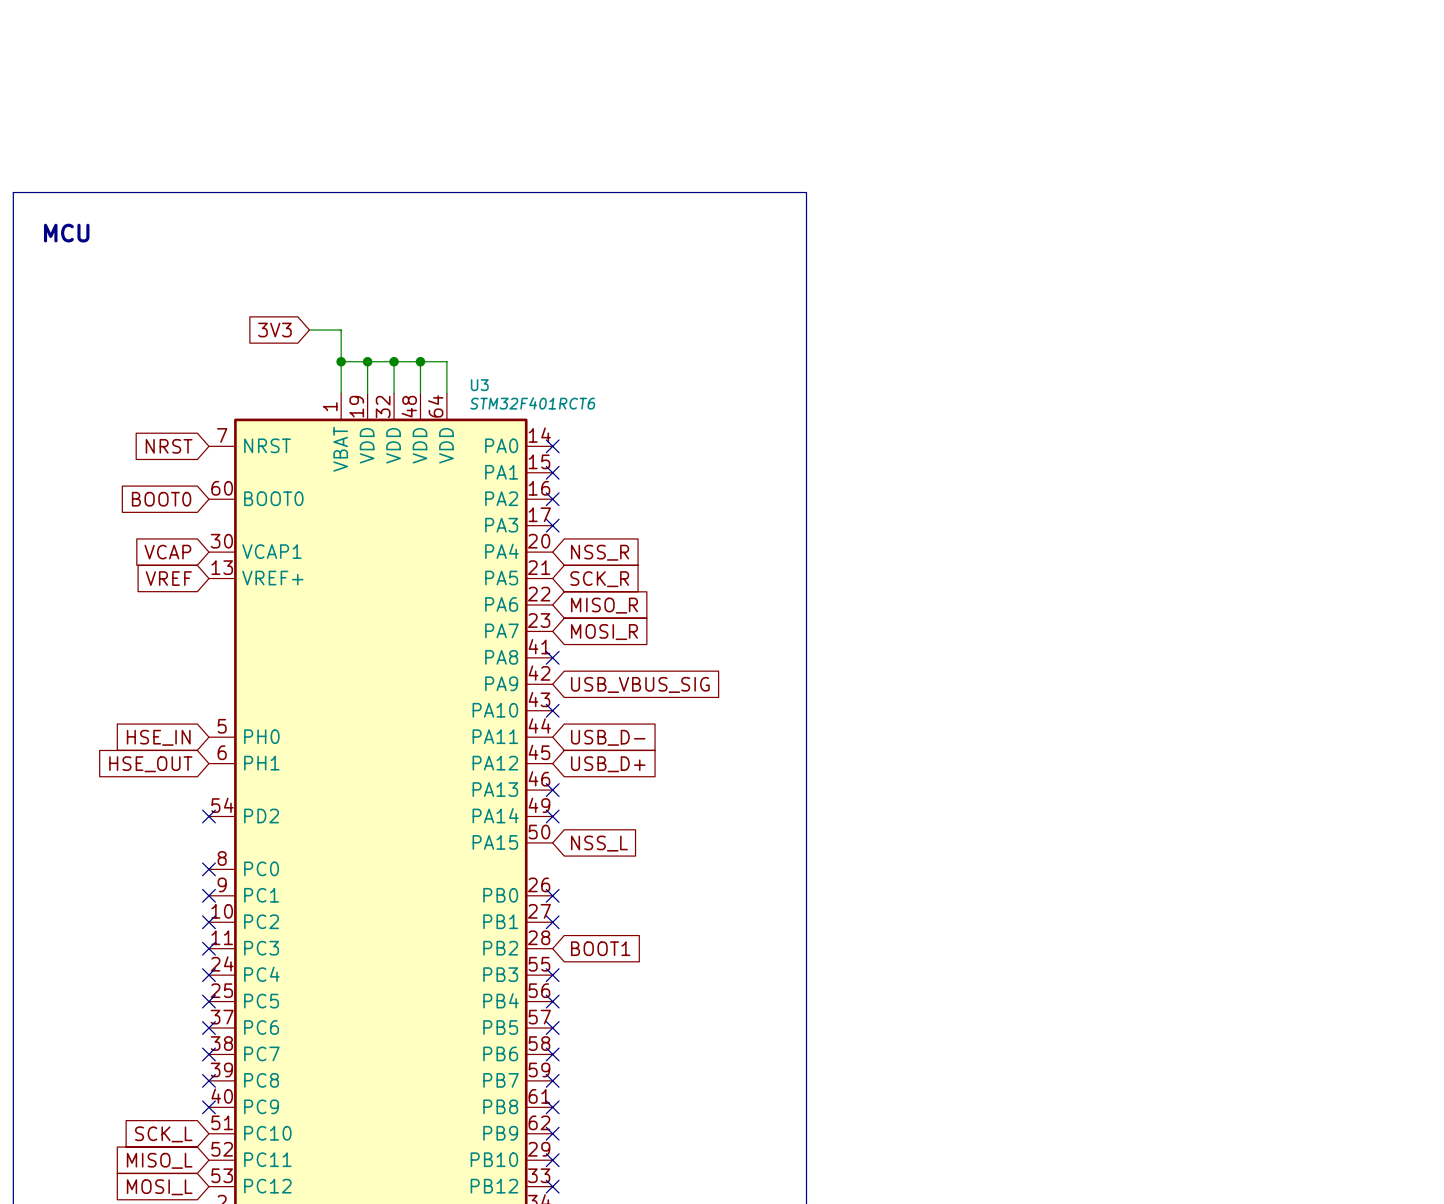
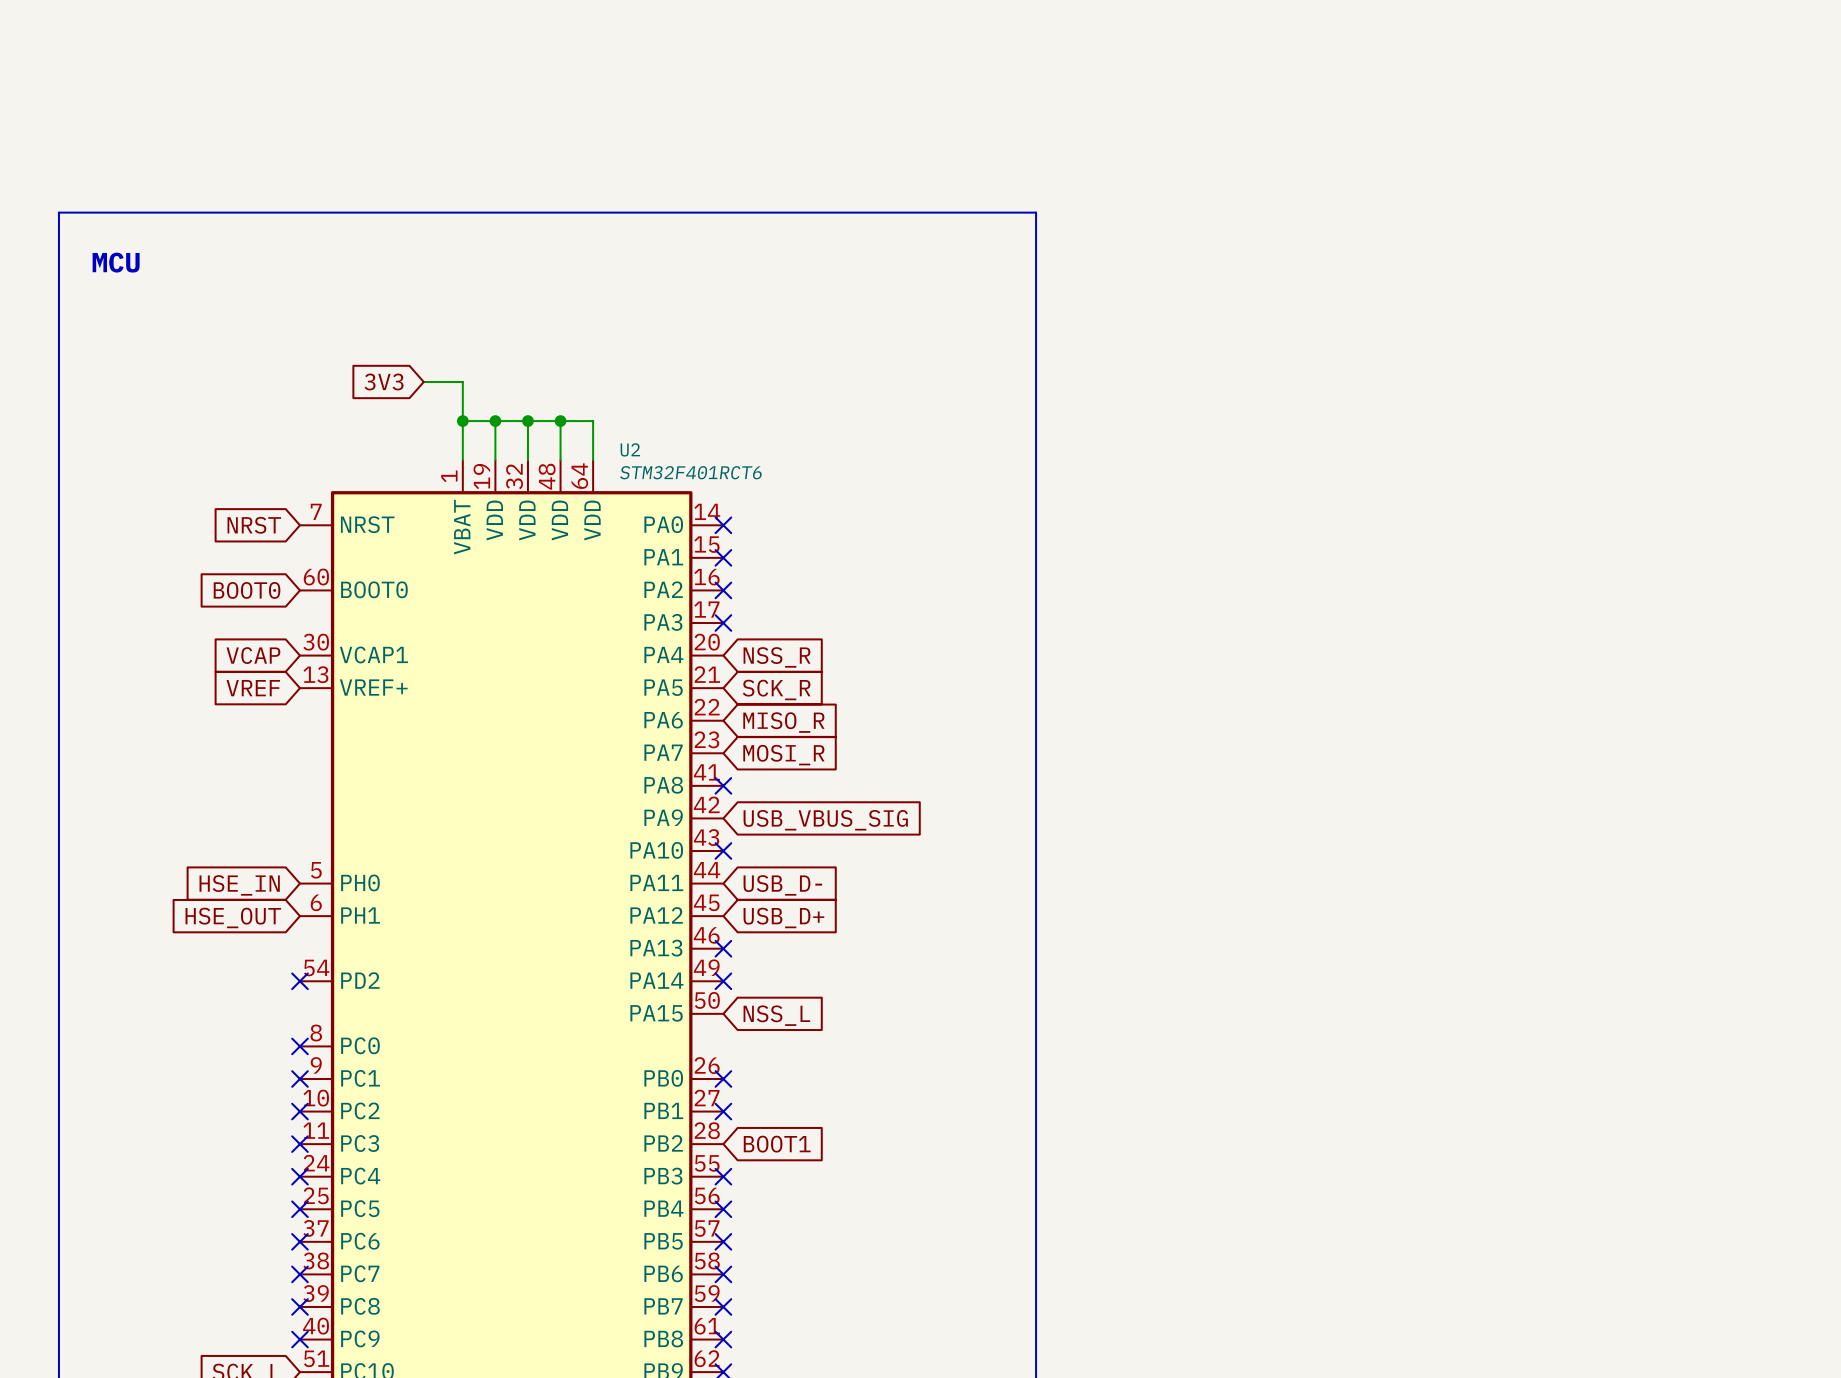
U3 name: U3 (479, 385) -> U2 (630, 449)

